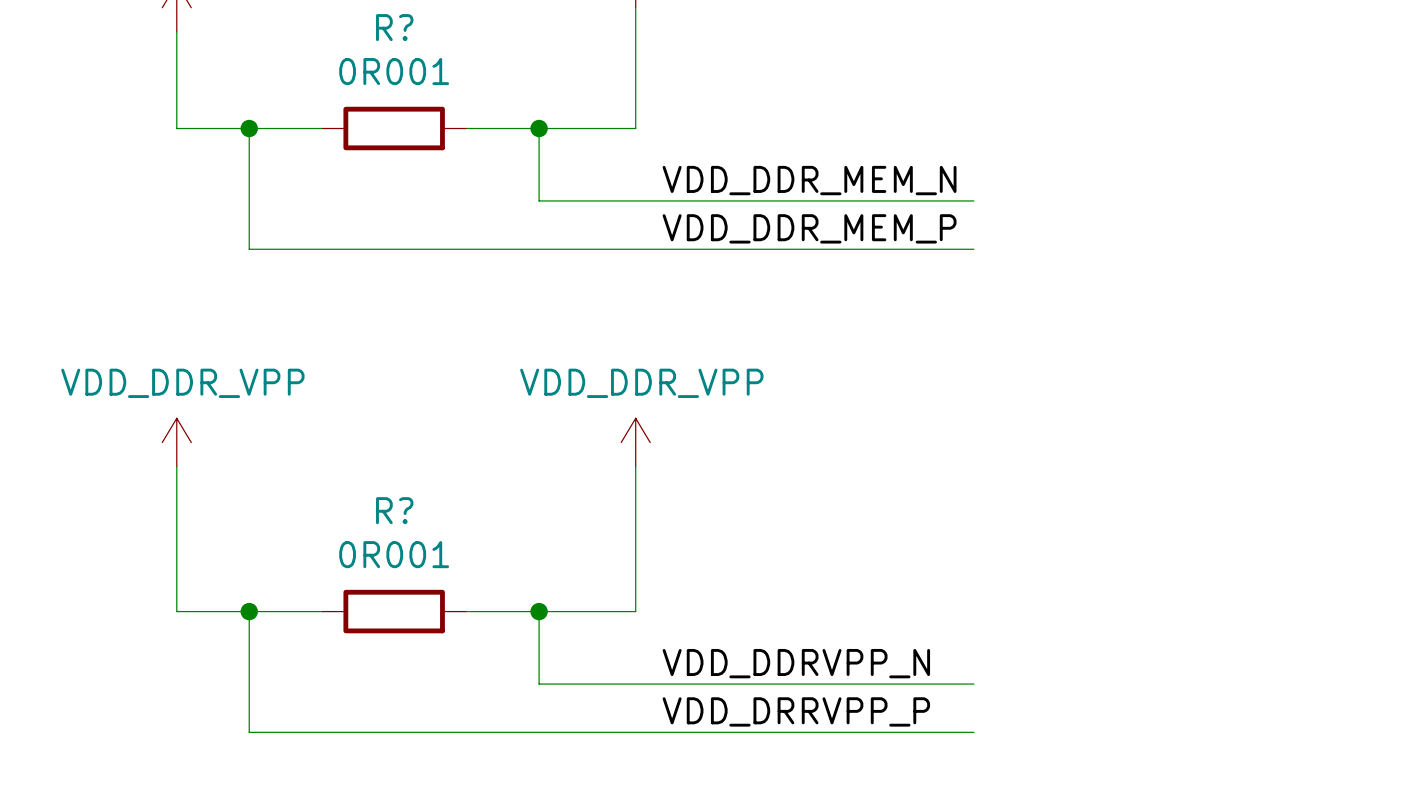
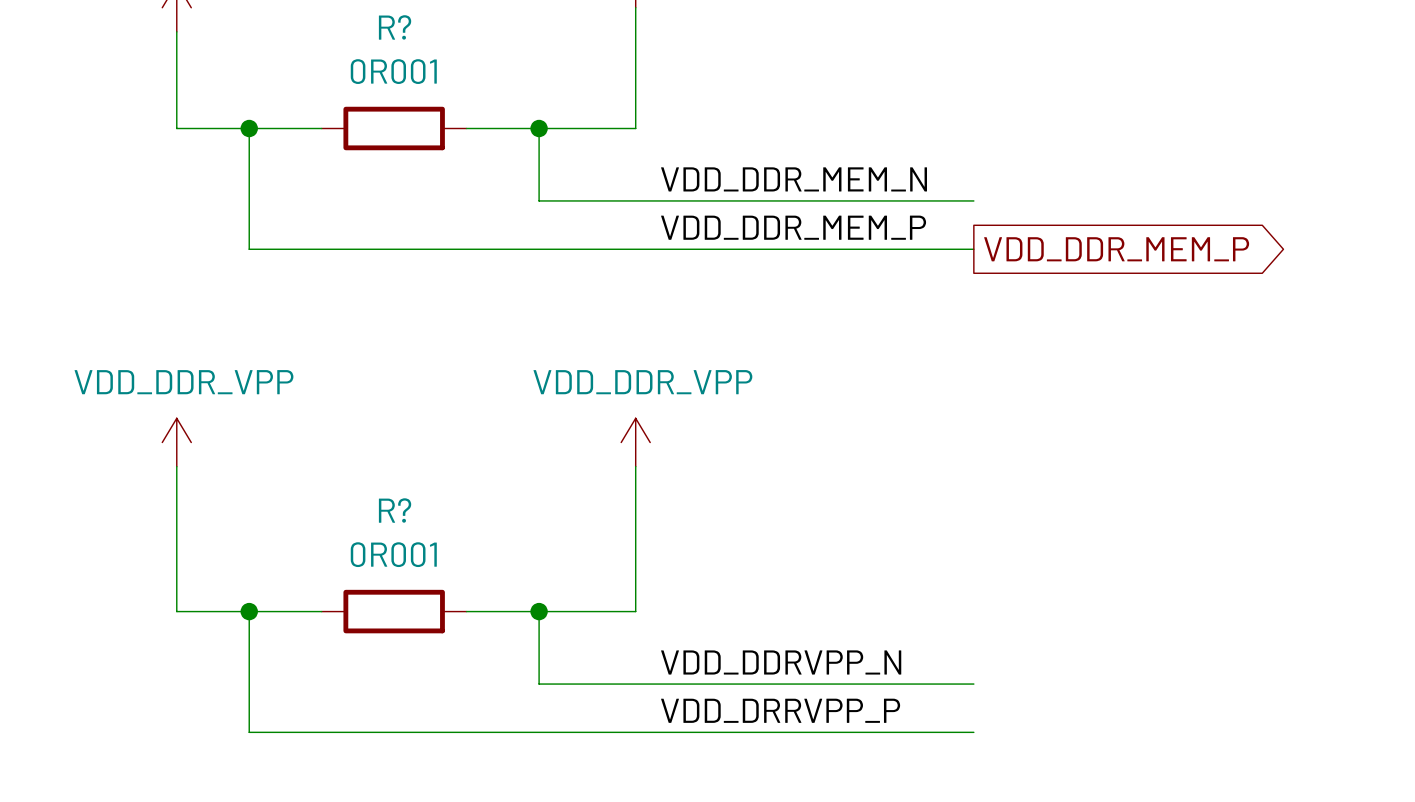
global label: none -> VDD_DDR_MEM_P (1116, 249)

